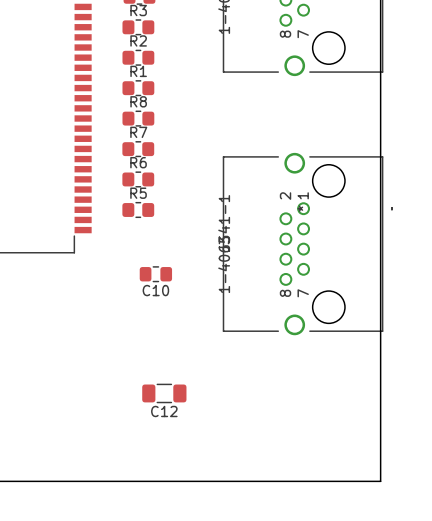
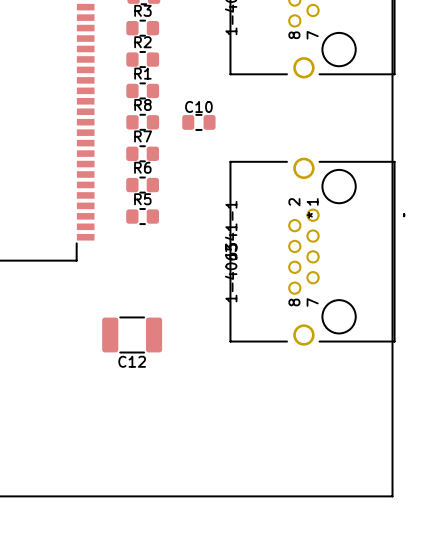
C10 position: (155, 274) -> (198, 122)
C10 name position: C10 (155, 290) -> C10 (198, 106)
C12 footprint: [142, 383, 187, 404] -> [102, 316, 163, 354]

